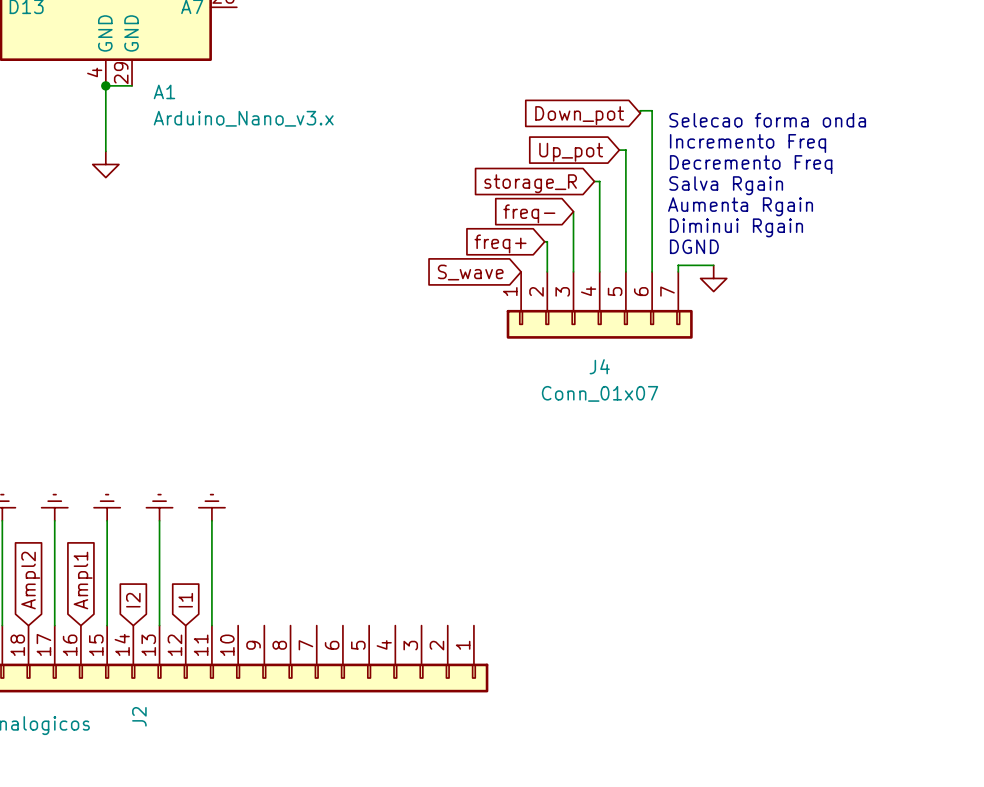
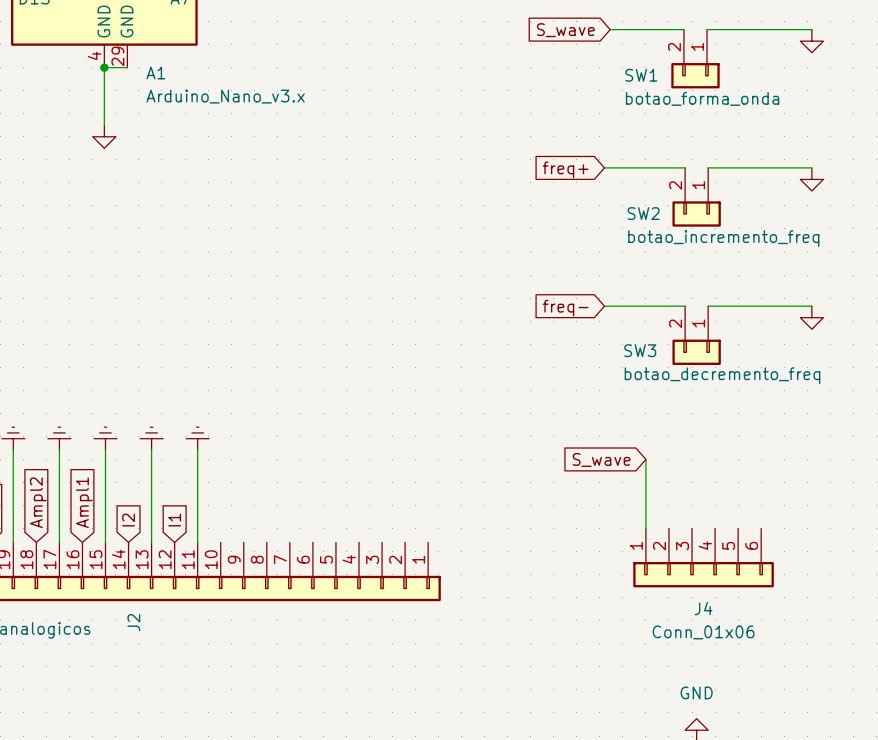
wire: none -> (610, 29) (683, 29)
wire: none -> (707, 29) (811, 29)
global label: none -> S_wave (565, 30)
power symbol: none -> (811, 41)
SW1: none -> botao_forma_onda (695, 59)
wire: (640, 113) (640, 110) (652, 110) (652, 271) -> none
global label: Down_pot (579, 115) -> none
text: Selecao forma onda (767, 120) -> none
text: Incremento Freq (748, 143) -> none
wire: (619, 150) (625, 150) (625, 271) -> none
global label: Up_pot (571, 152) -> none
text: Decremento Freq (751, 164) -> none
wire: (594, 181) (599, 181) (599, 271) -> none
global label: storage_R (530, 183) -> none
text: Salva Rgain (726, 185) -> none
wire: none -> (604, 167) (685, 167)
wire: none -> (708, 167) (811, 167)
text: Aumenta Rgain (740, 206) -> none
wire: (573, 211) (573, 271) -> none
power symbol: none -> (811, 179)
global label position: freq- (529, 213) -> freq- (565, 308)
text: Diminui Rgain (736, 227) -> none
SW2: none -> botao_incremento_freq (696, 197)
wire: (544, 241) (547, 241) (547, 271) -> none
global label position: freq+ (500, 243) -> freq+ (565, 169)
text: DGND (694, 246) -> none
wire: (713, 265) (678, 265) (678, 271) -> none
J4 symbol: [506, 271, 693, 339] -> [633, 528, 774, 588]
global label: S_wave (470, 272) -> none
power symbol: (713, 278) -> none
wire: none -> (604, 306) (685, 306)
wire: none -> (708, 306) (811, 306)
power symbol: none -> (811, 317)
SW3: none -> botao_decremento_freq (696, 335)
J4 value: Conn_01x07 (600, 393) -> Conn_01x06 (703, 632)
global label: none -> S_wave (601, 459)
wire: none -> (645, 459) (645, 528)

